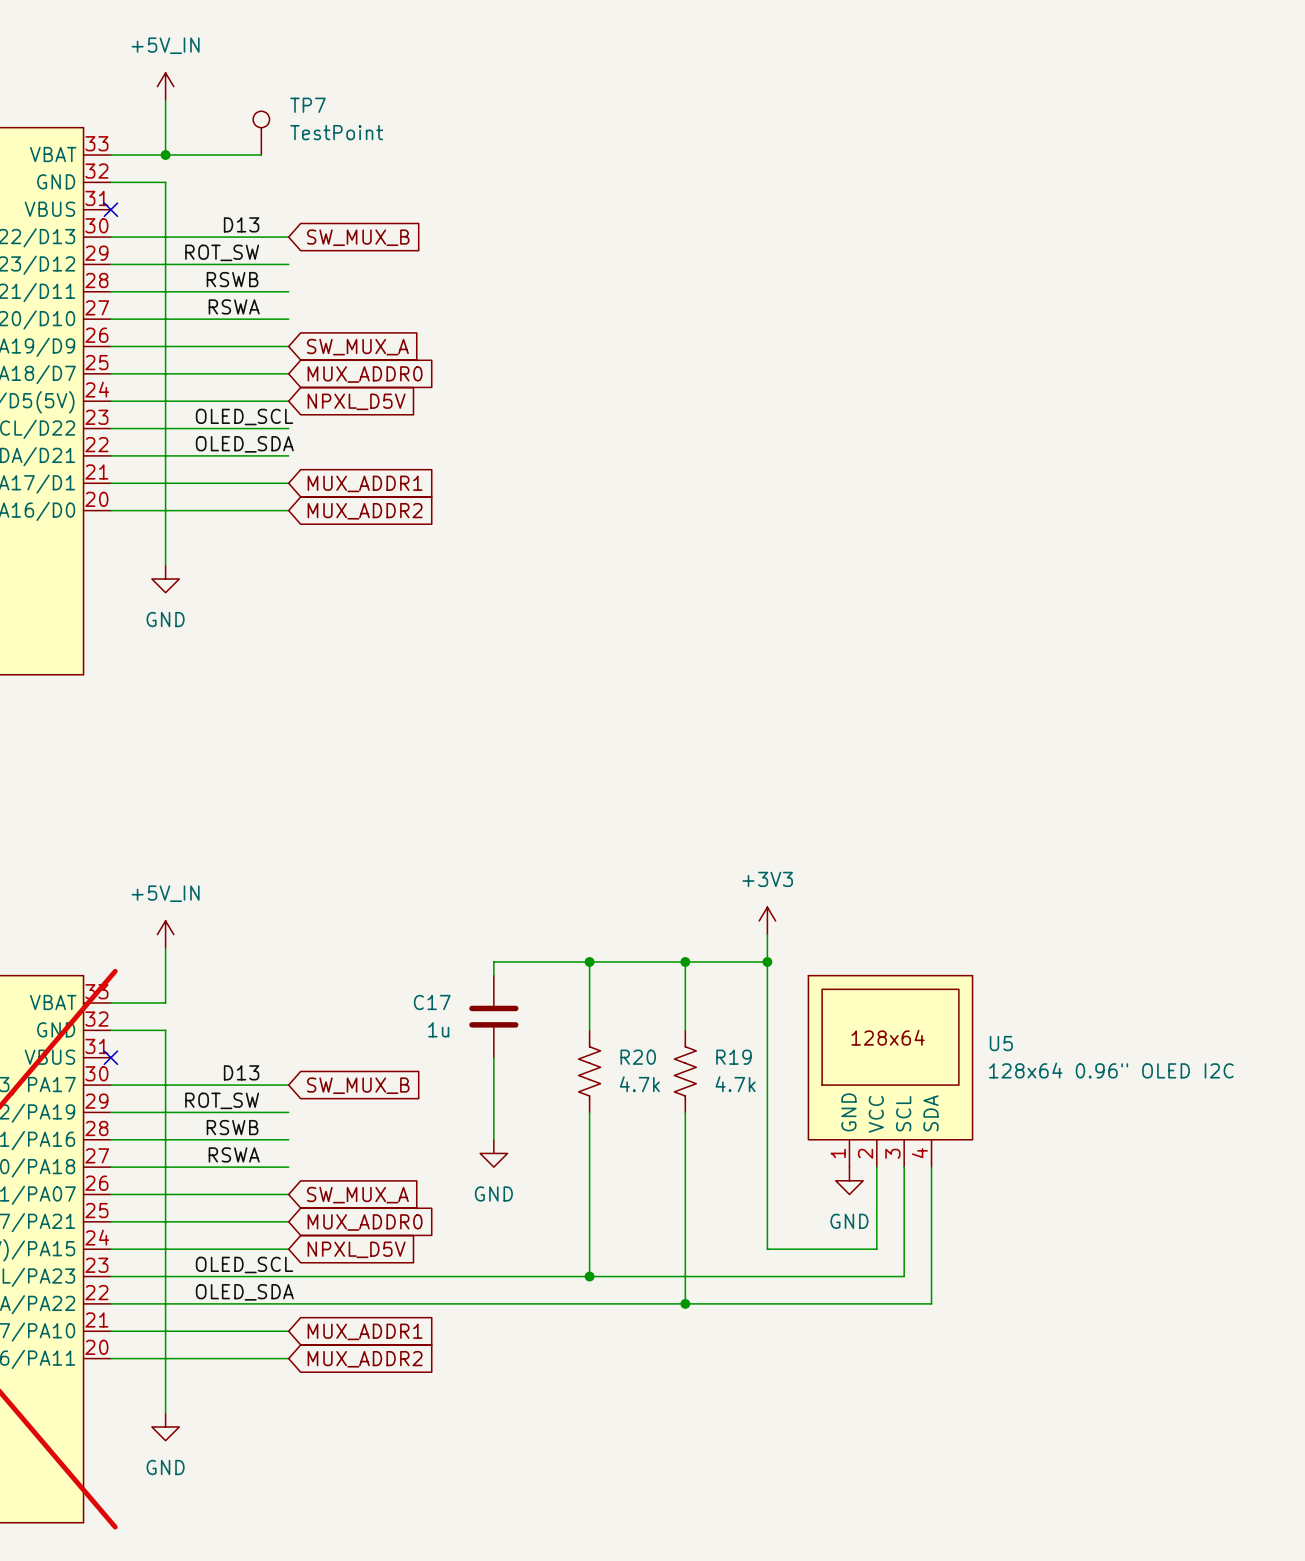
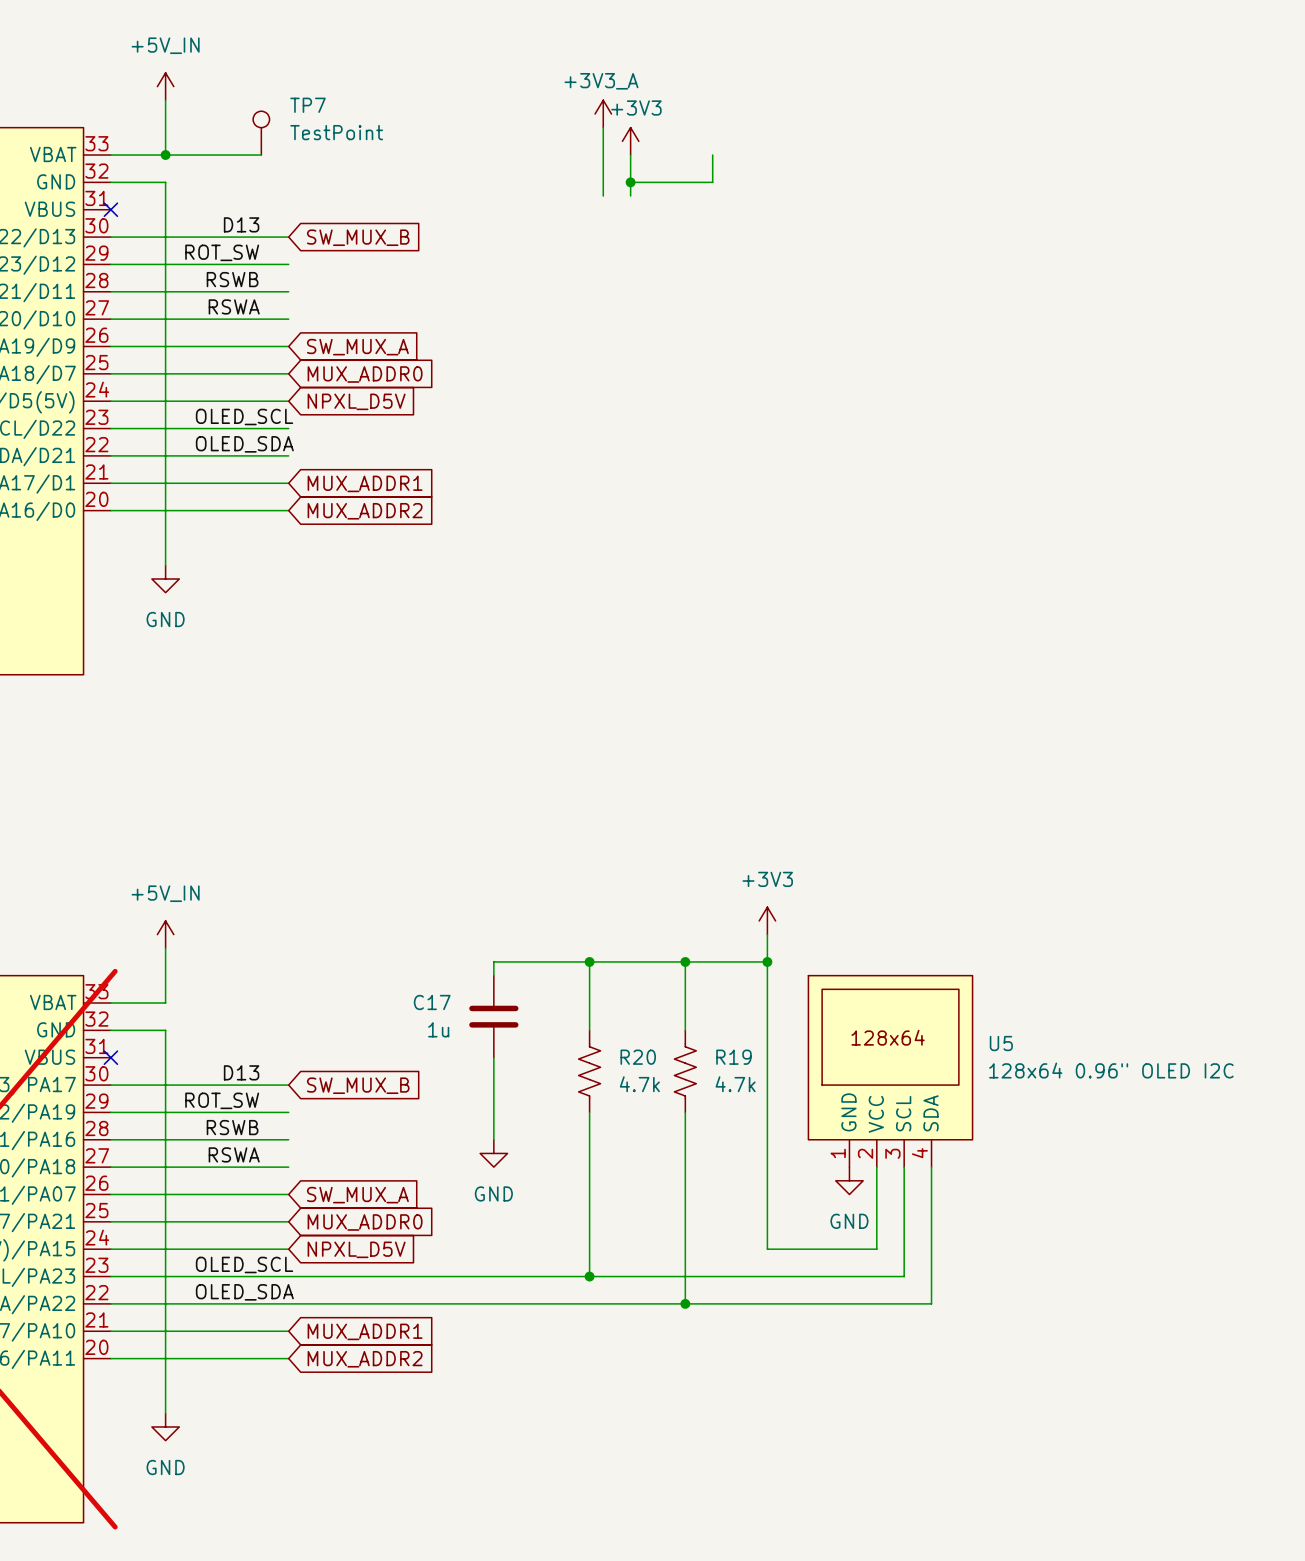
power symbol: none -> +3V3_A (603, 113)
wire: none -> (603, 127) (603, 196)
power symbol: none -> +3V3 (630, 141)
wire: none -> (630, 155) (630, 196)
wire: none -> (712, 155) (712, 182) (630, 182)
junction: none -> (630, 182)

